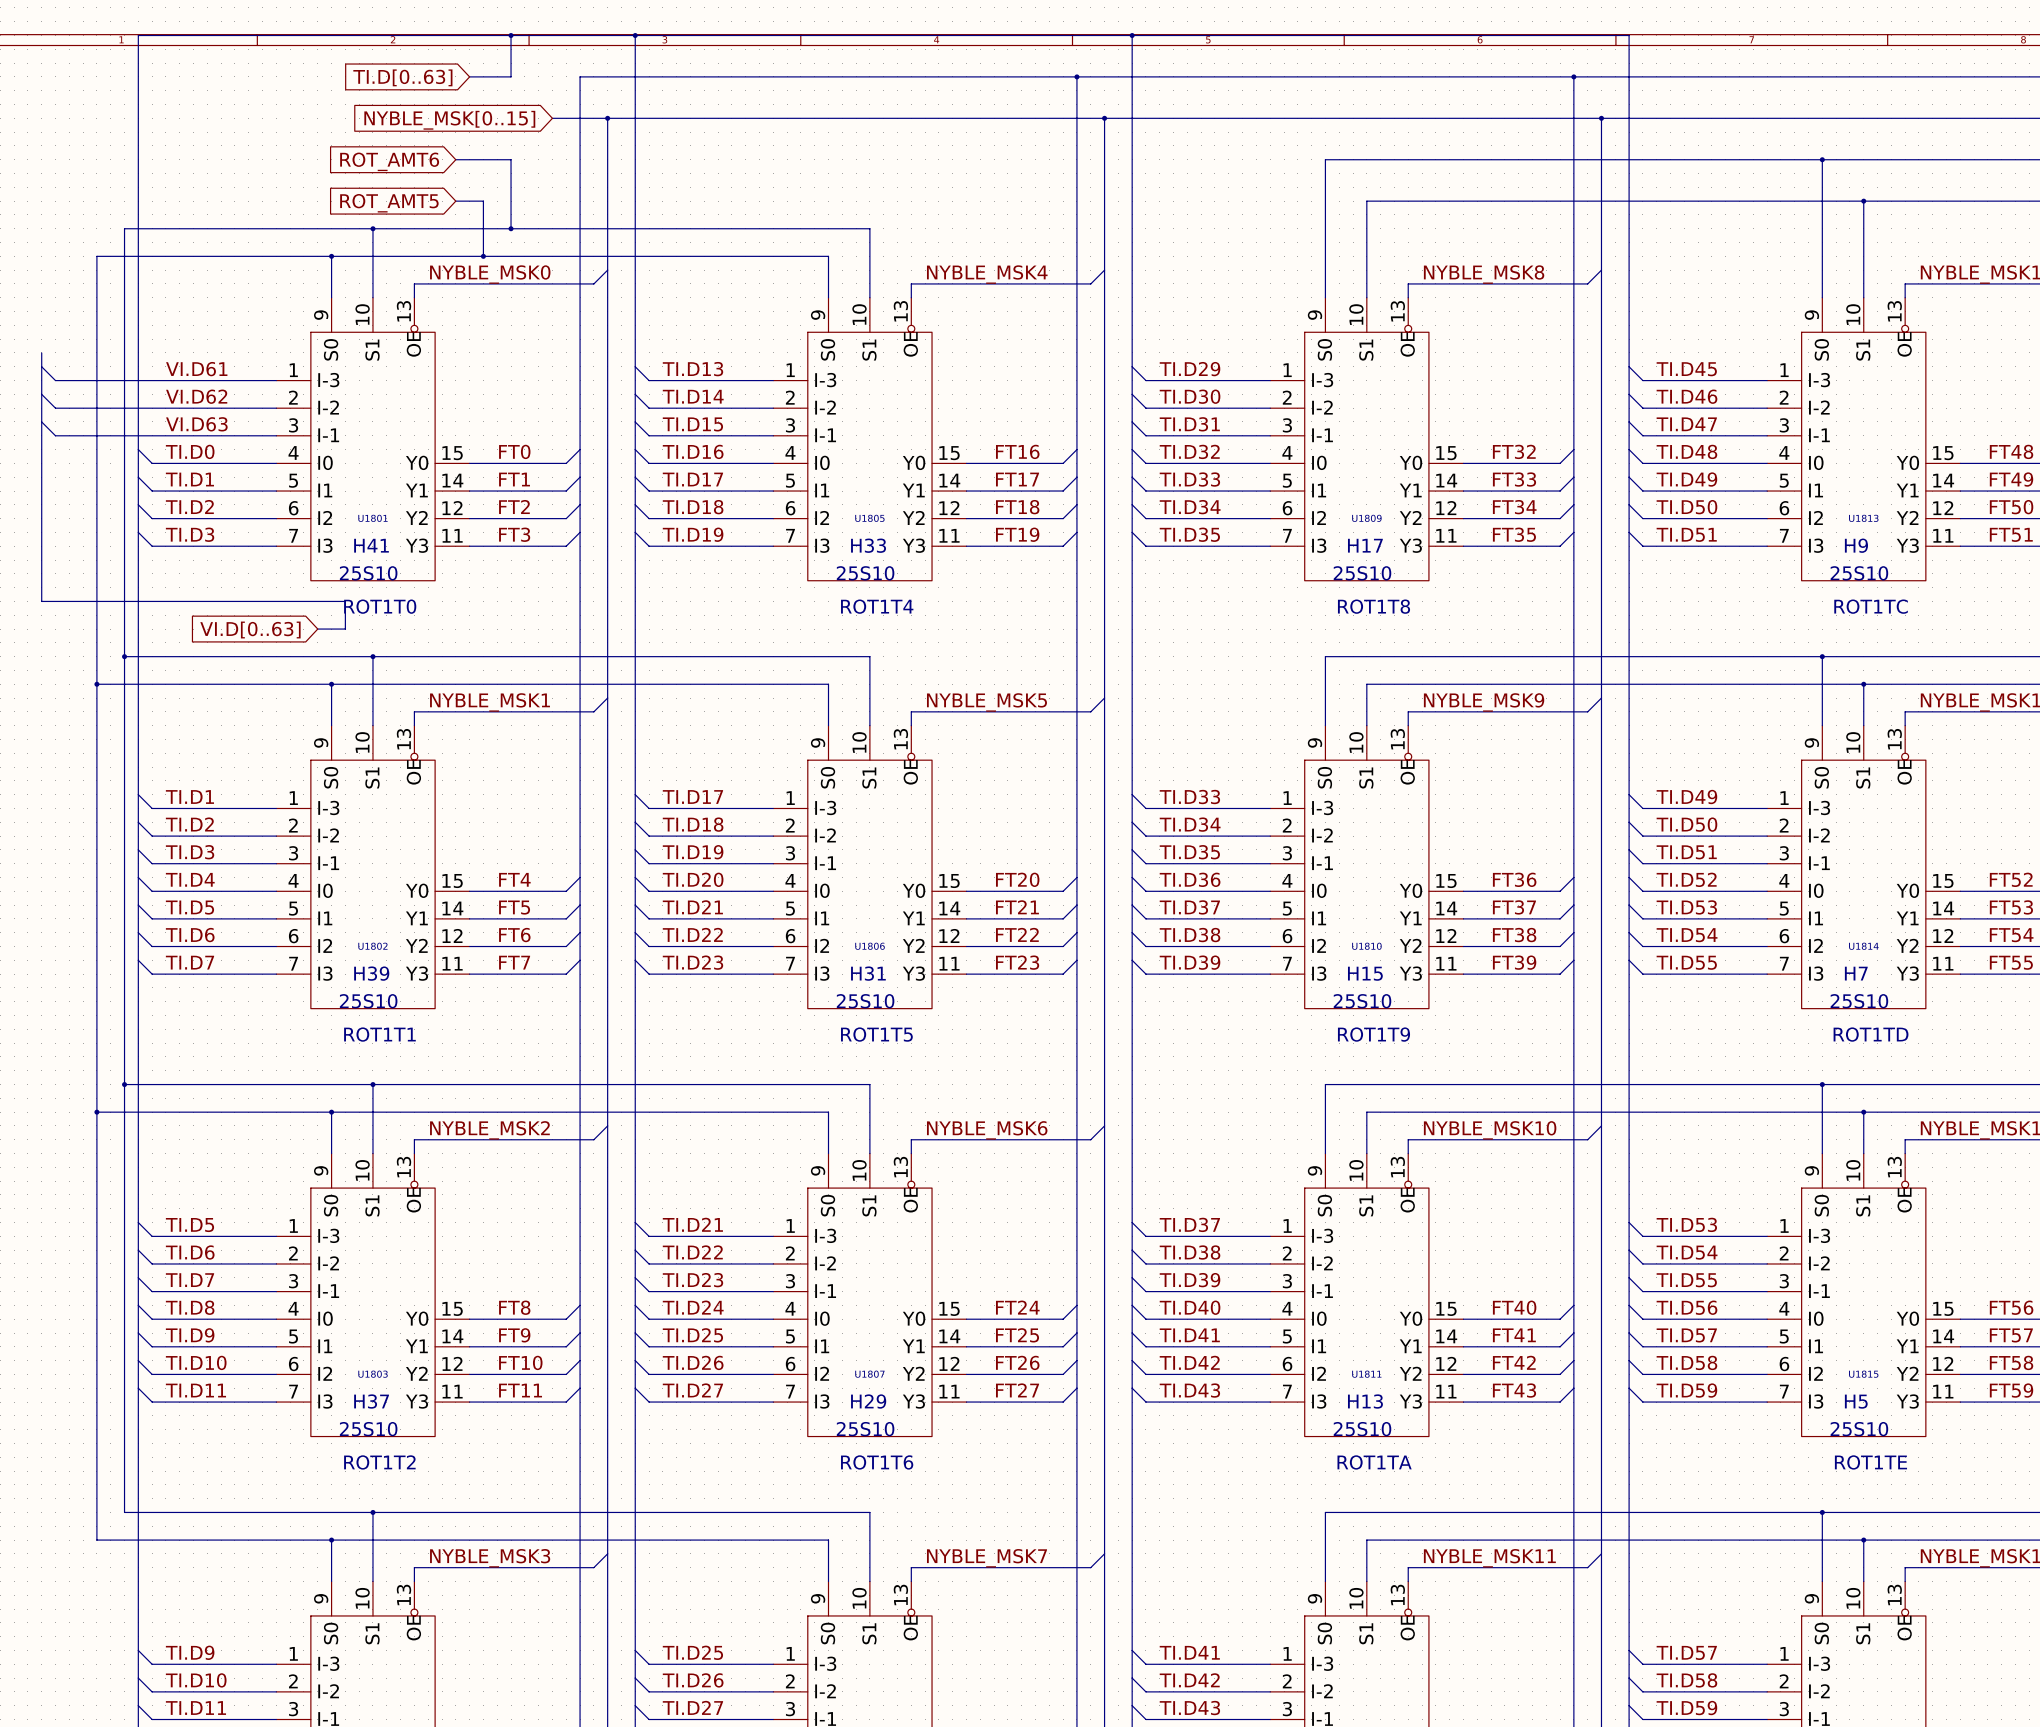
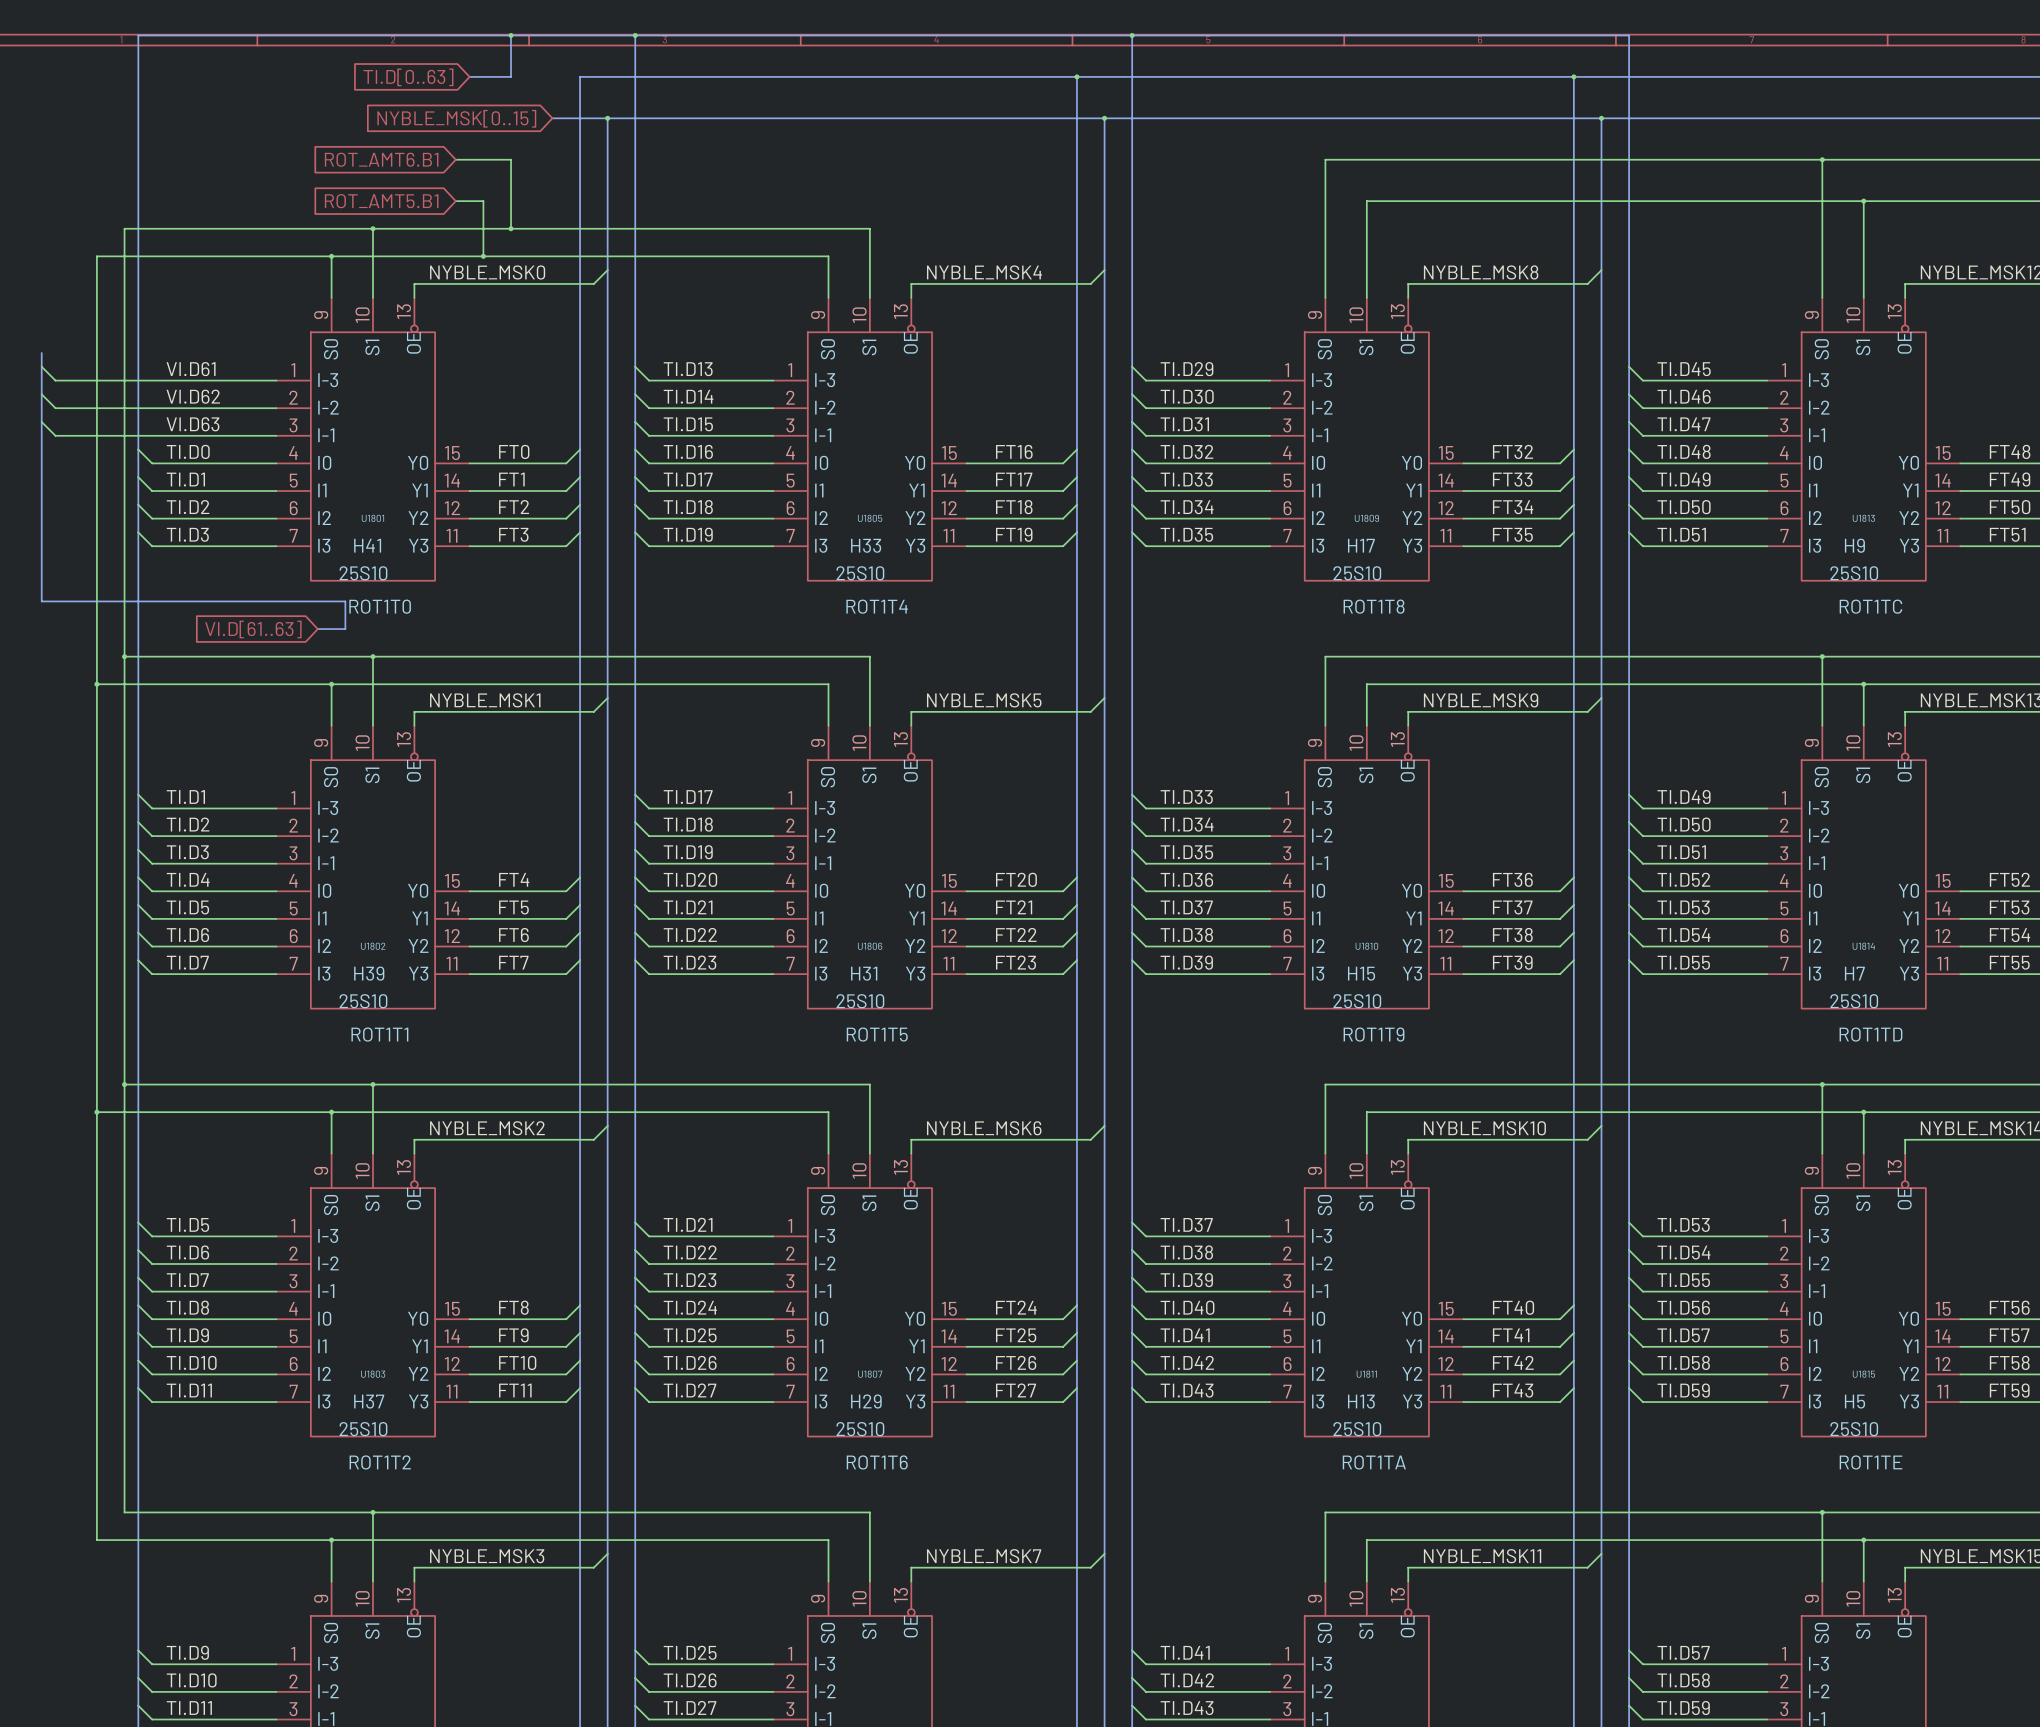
global label: ROT_AMT6 (389, 161) -> ROT_AMT6.B1 (381, 159)
global label: ROT_AMT5 (389, 203) -> ROT_AMT5.B1 (381, 201)
global label: VI.D[0..63] (250, 630) -> VI.D[61..63] (253, 629)

